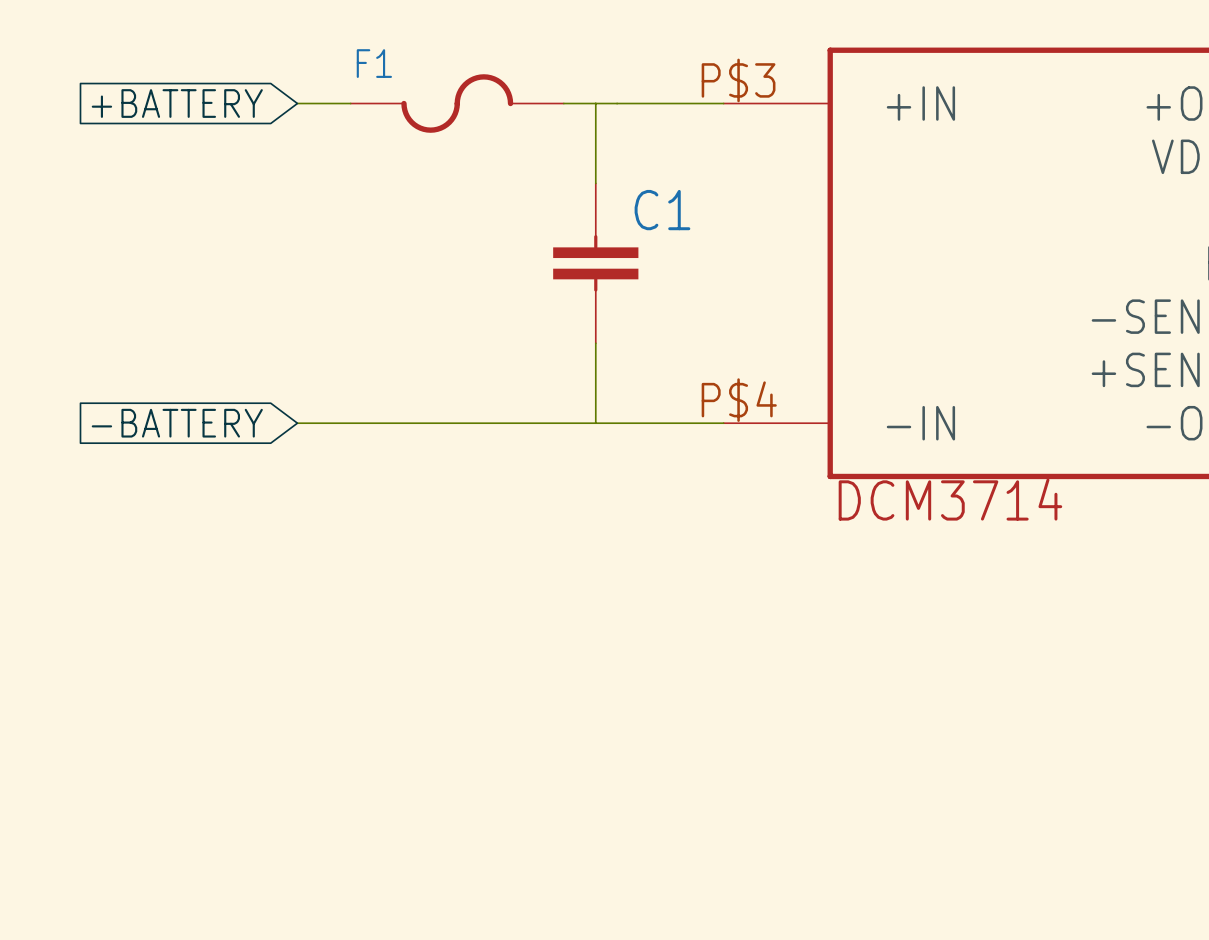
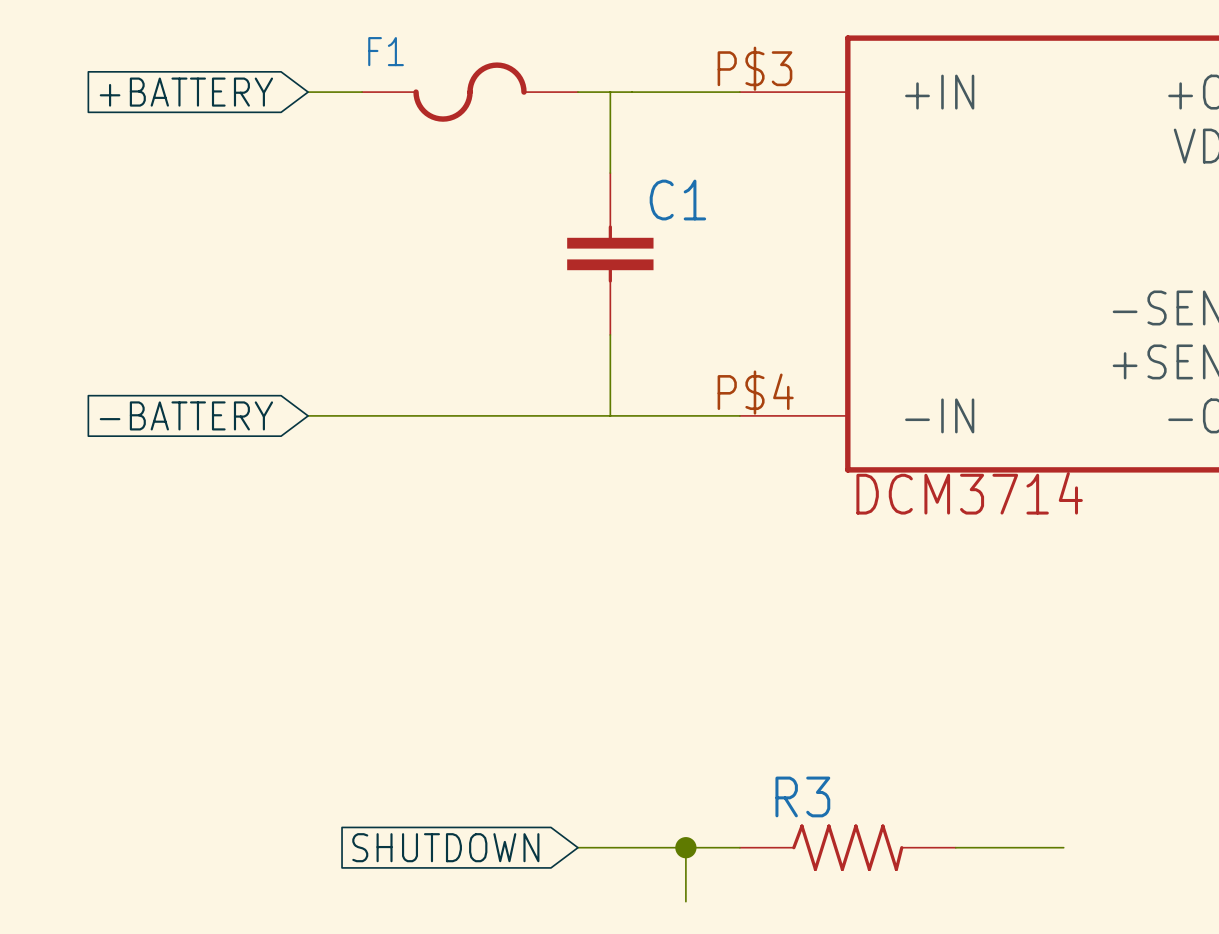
global label: none -> SHUTDOWN (445, 847)
wire: none -> (577, 847) (739, 847)
wire: none -> (685, 847) (685, 901)
junction: none -> (685, 847)
R3: none -> (847, 847)
wire: none -> (955, 847) (1063, 847)

